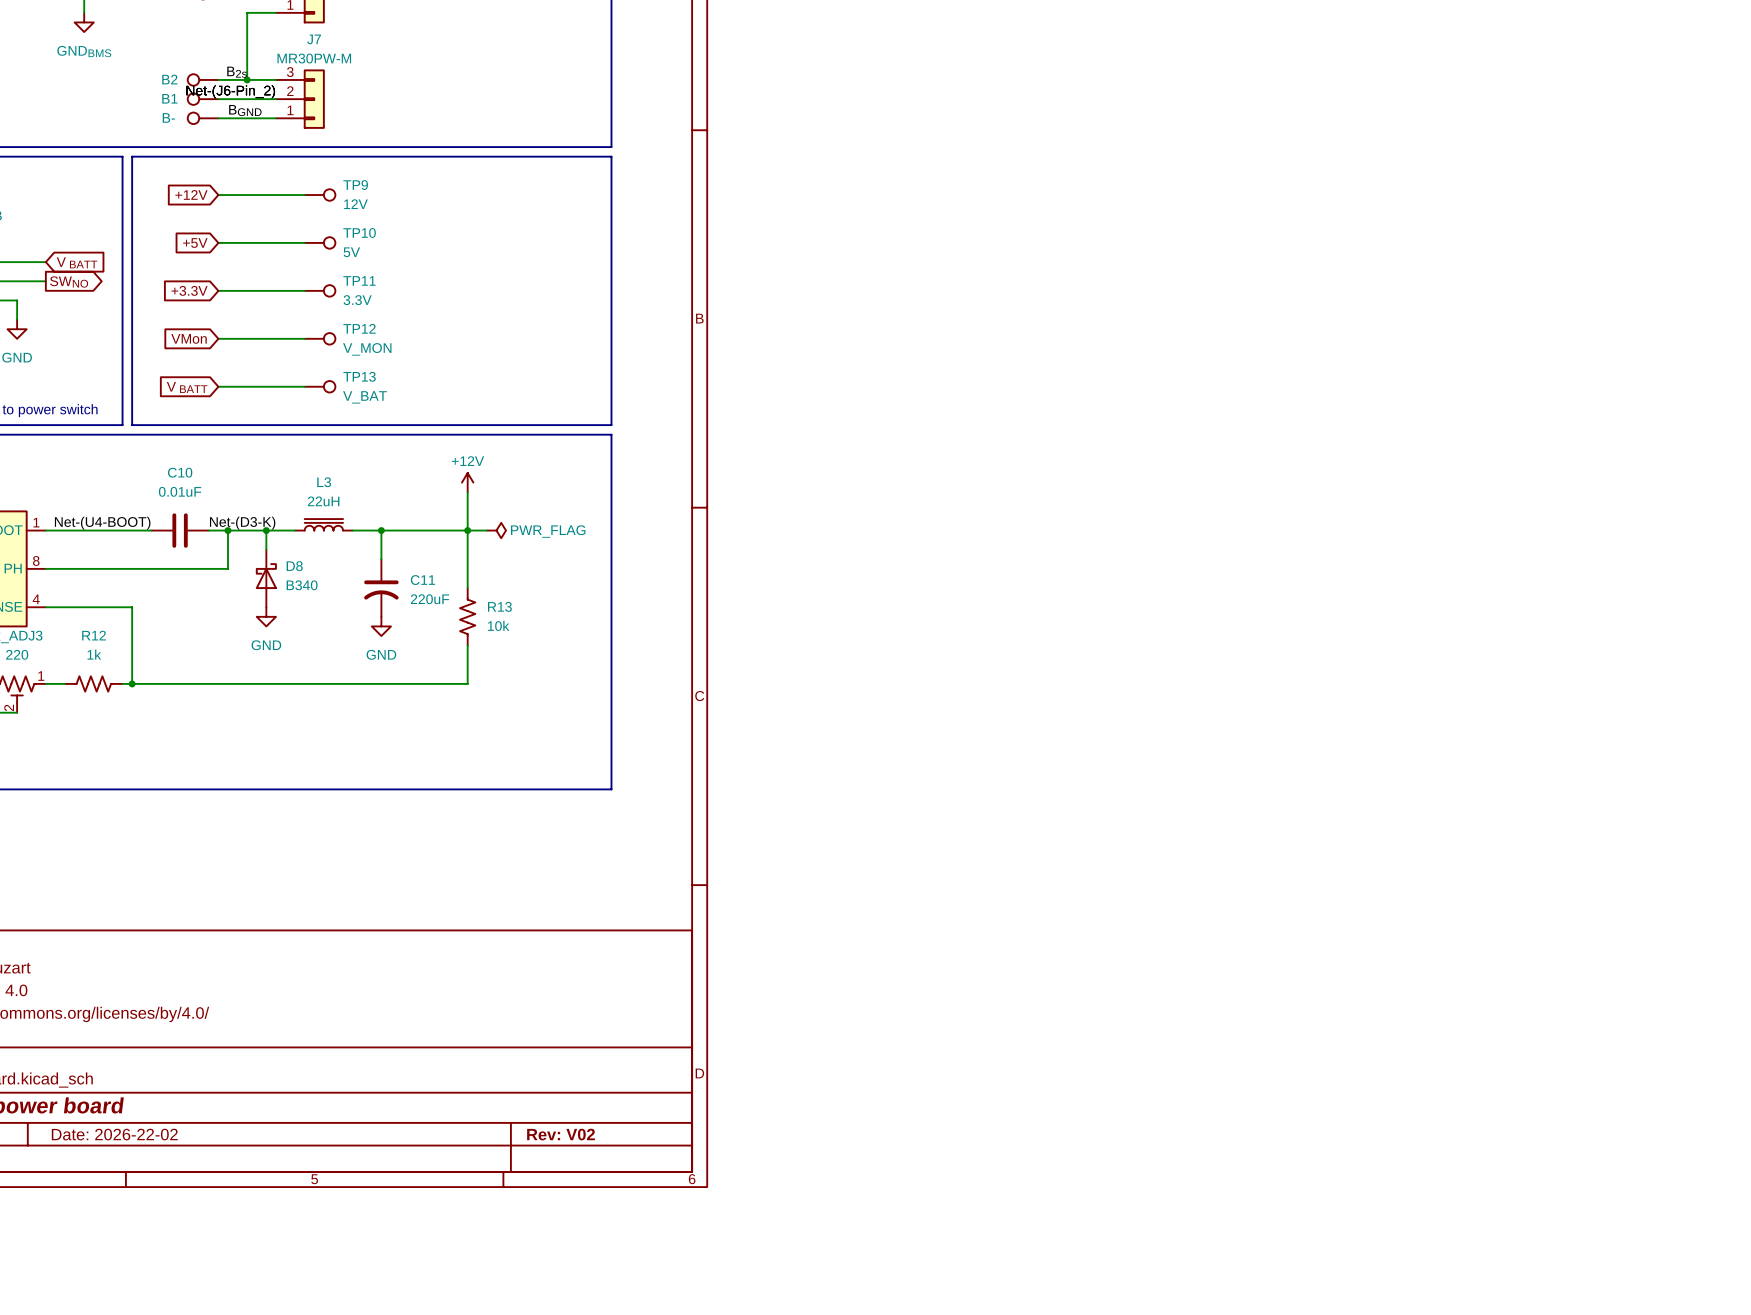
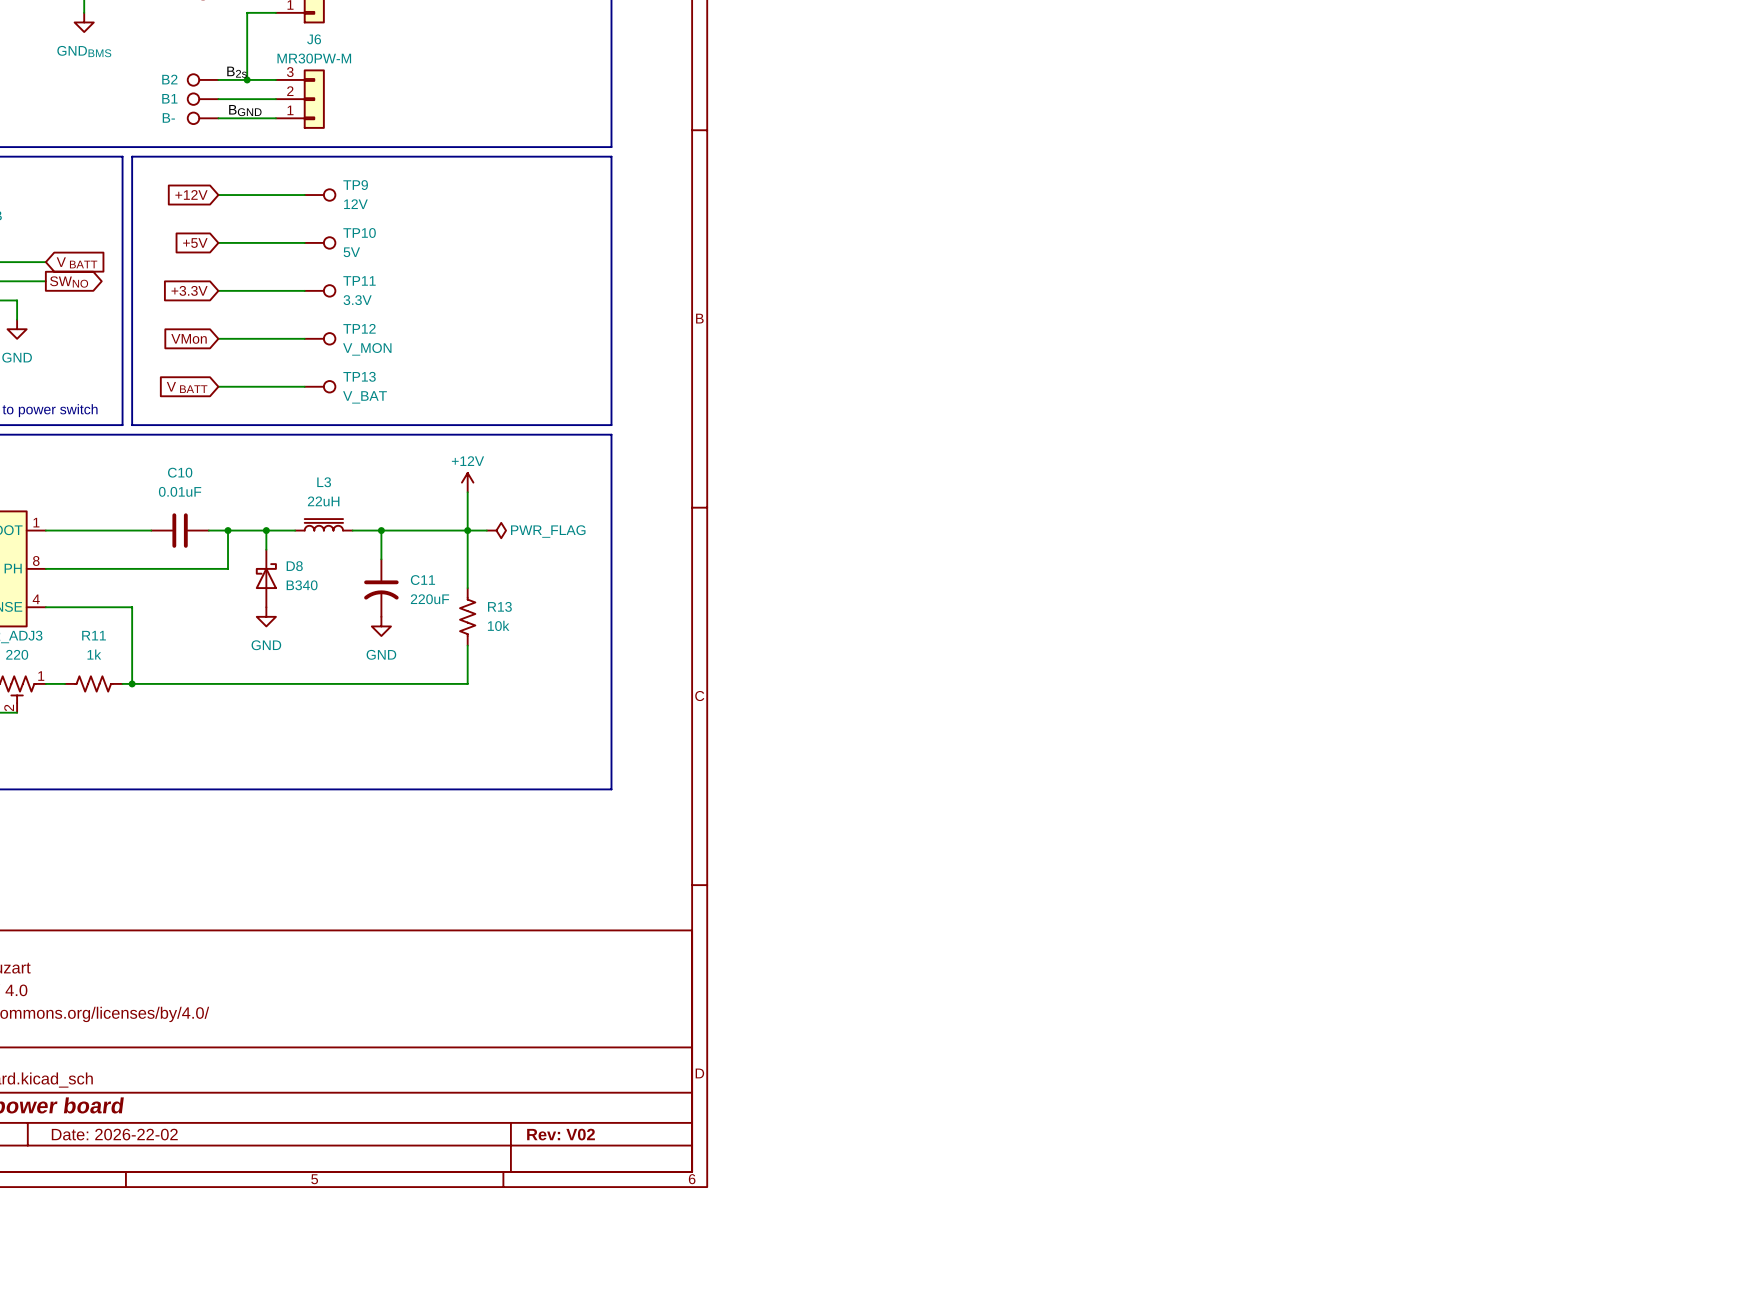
J7 name: J7 (314, 39) -> J6 (314, 39)
label: Net-(J6-Pin_2) (230, 91) -> none
label: Net-(U4-BOOT) (102, 523) -> none
label: Net-(D3-K) (242, 523) -> none
R12 name: R12 (94, 635) -> R11 (94, 635)

